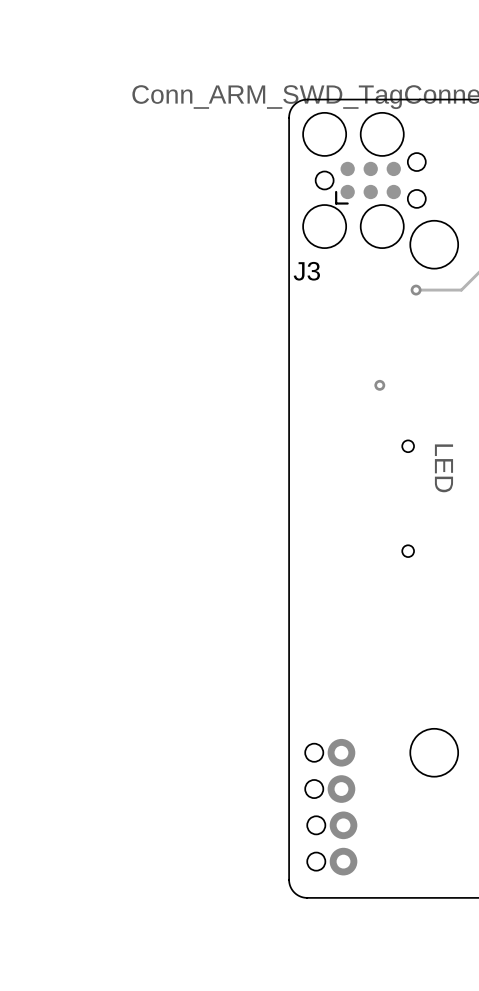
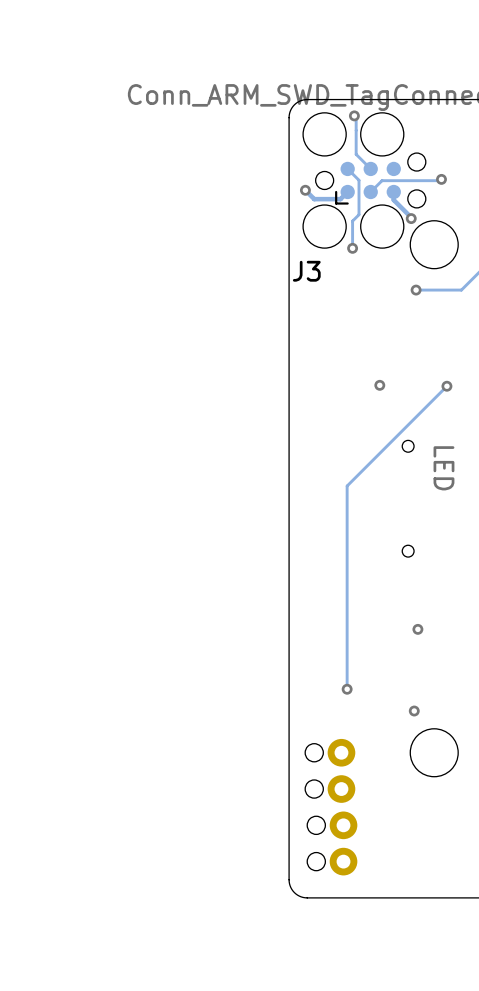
track: none -> (354, 115) (356, 117) (356, 154) (370, 168)
via: none -> (354, 115)
track: none -> (347, 168) (359, 180) (359, 214) (352, 221) (352, 248)
track: none -> (441, 179) (382, 180) (370, 192)
via: none -> (441, 179)
track: none -> (305, 190) (314, 199) (340, 199) (347, 192)
via: none -> (305, 190)
track: none -> (393, 192) (393, 200) (411, 218)
via: none -> (411, 218)
via: none -> (352, 248)
track: none -> (446, 386) (347, 486) (347, 689)
via: none -> (446, 386)
via: none -> (417, 629)
via: none -> (347, 689)
via: none -> (414, 711)

